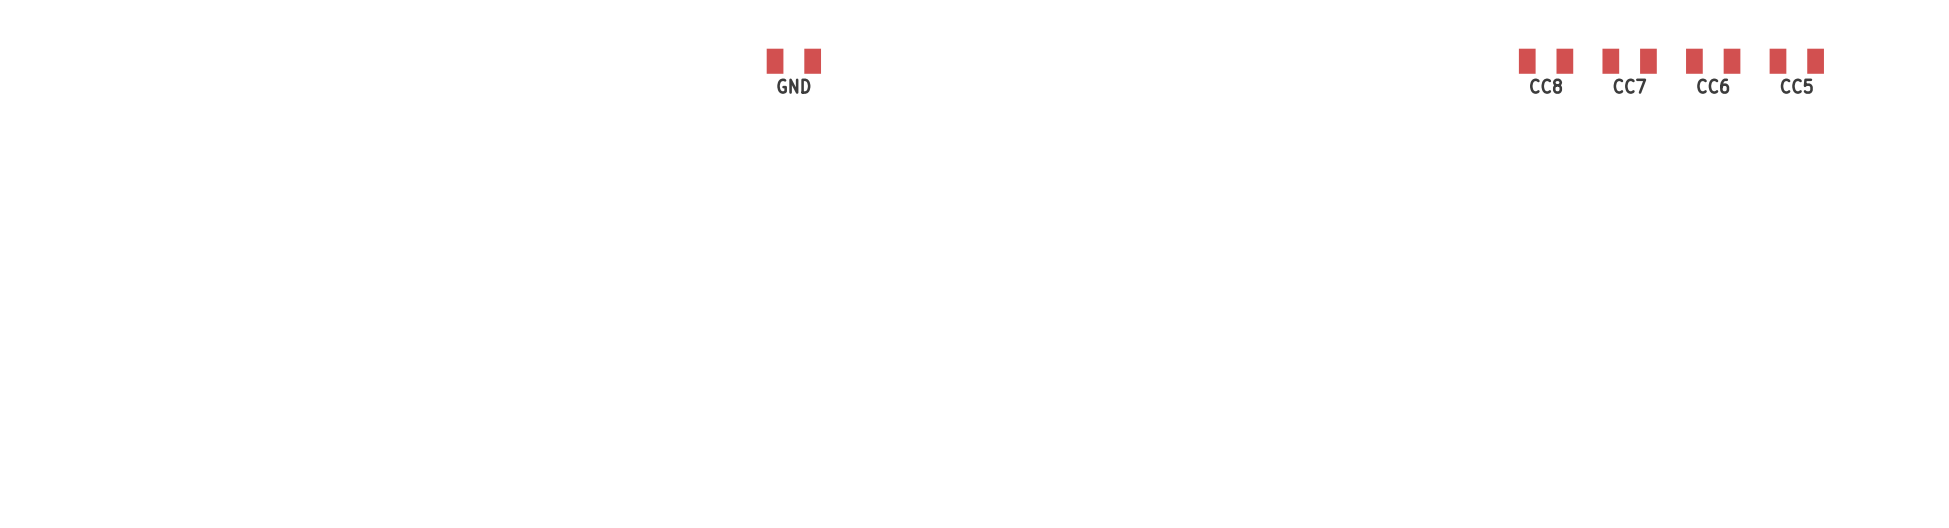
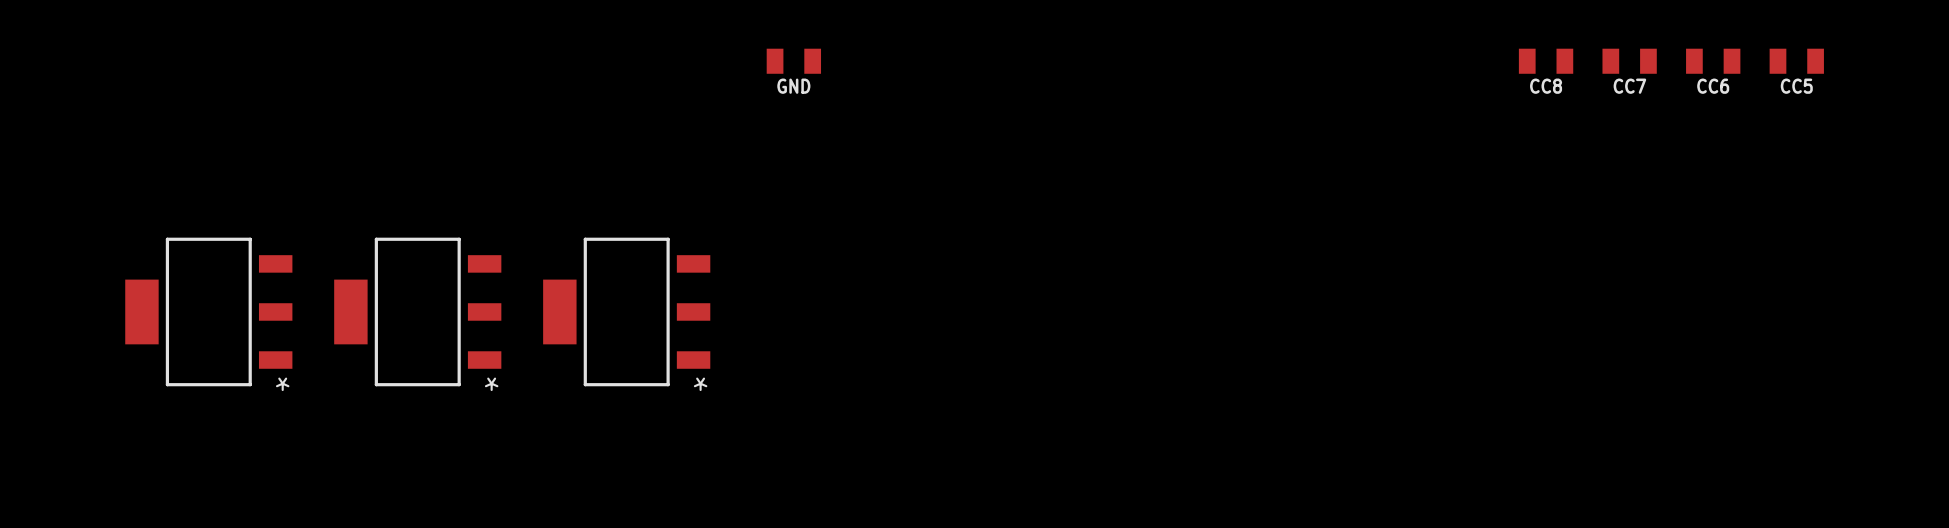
part: none -> (208, 311)
part: none -> (417, 311)
part: none -> (626, 311)

